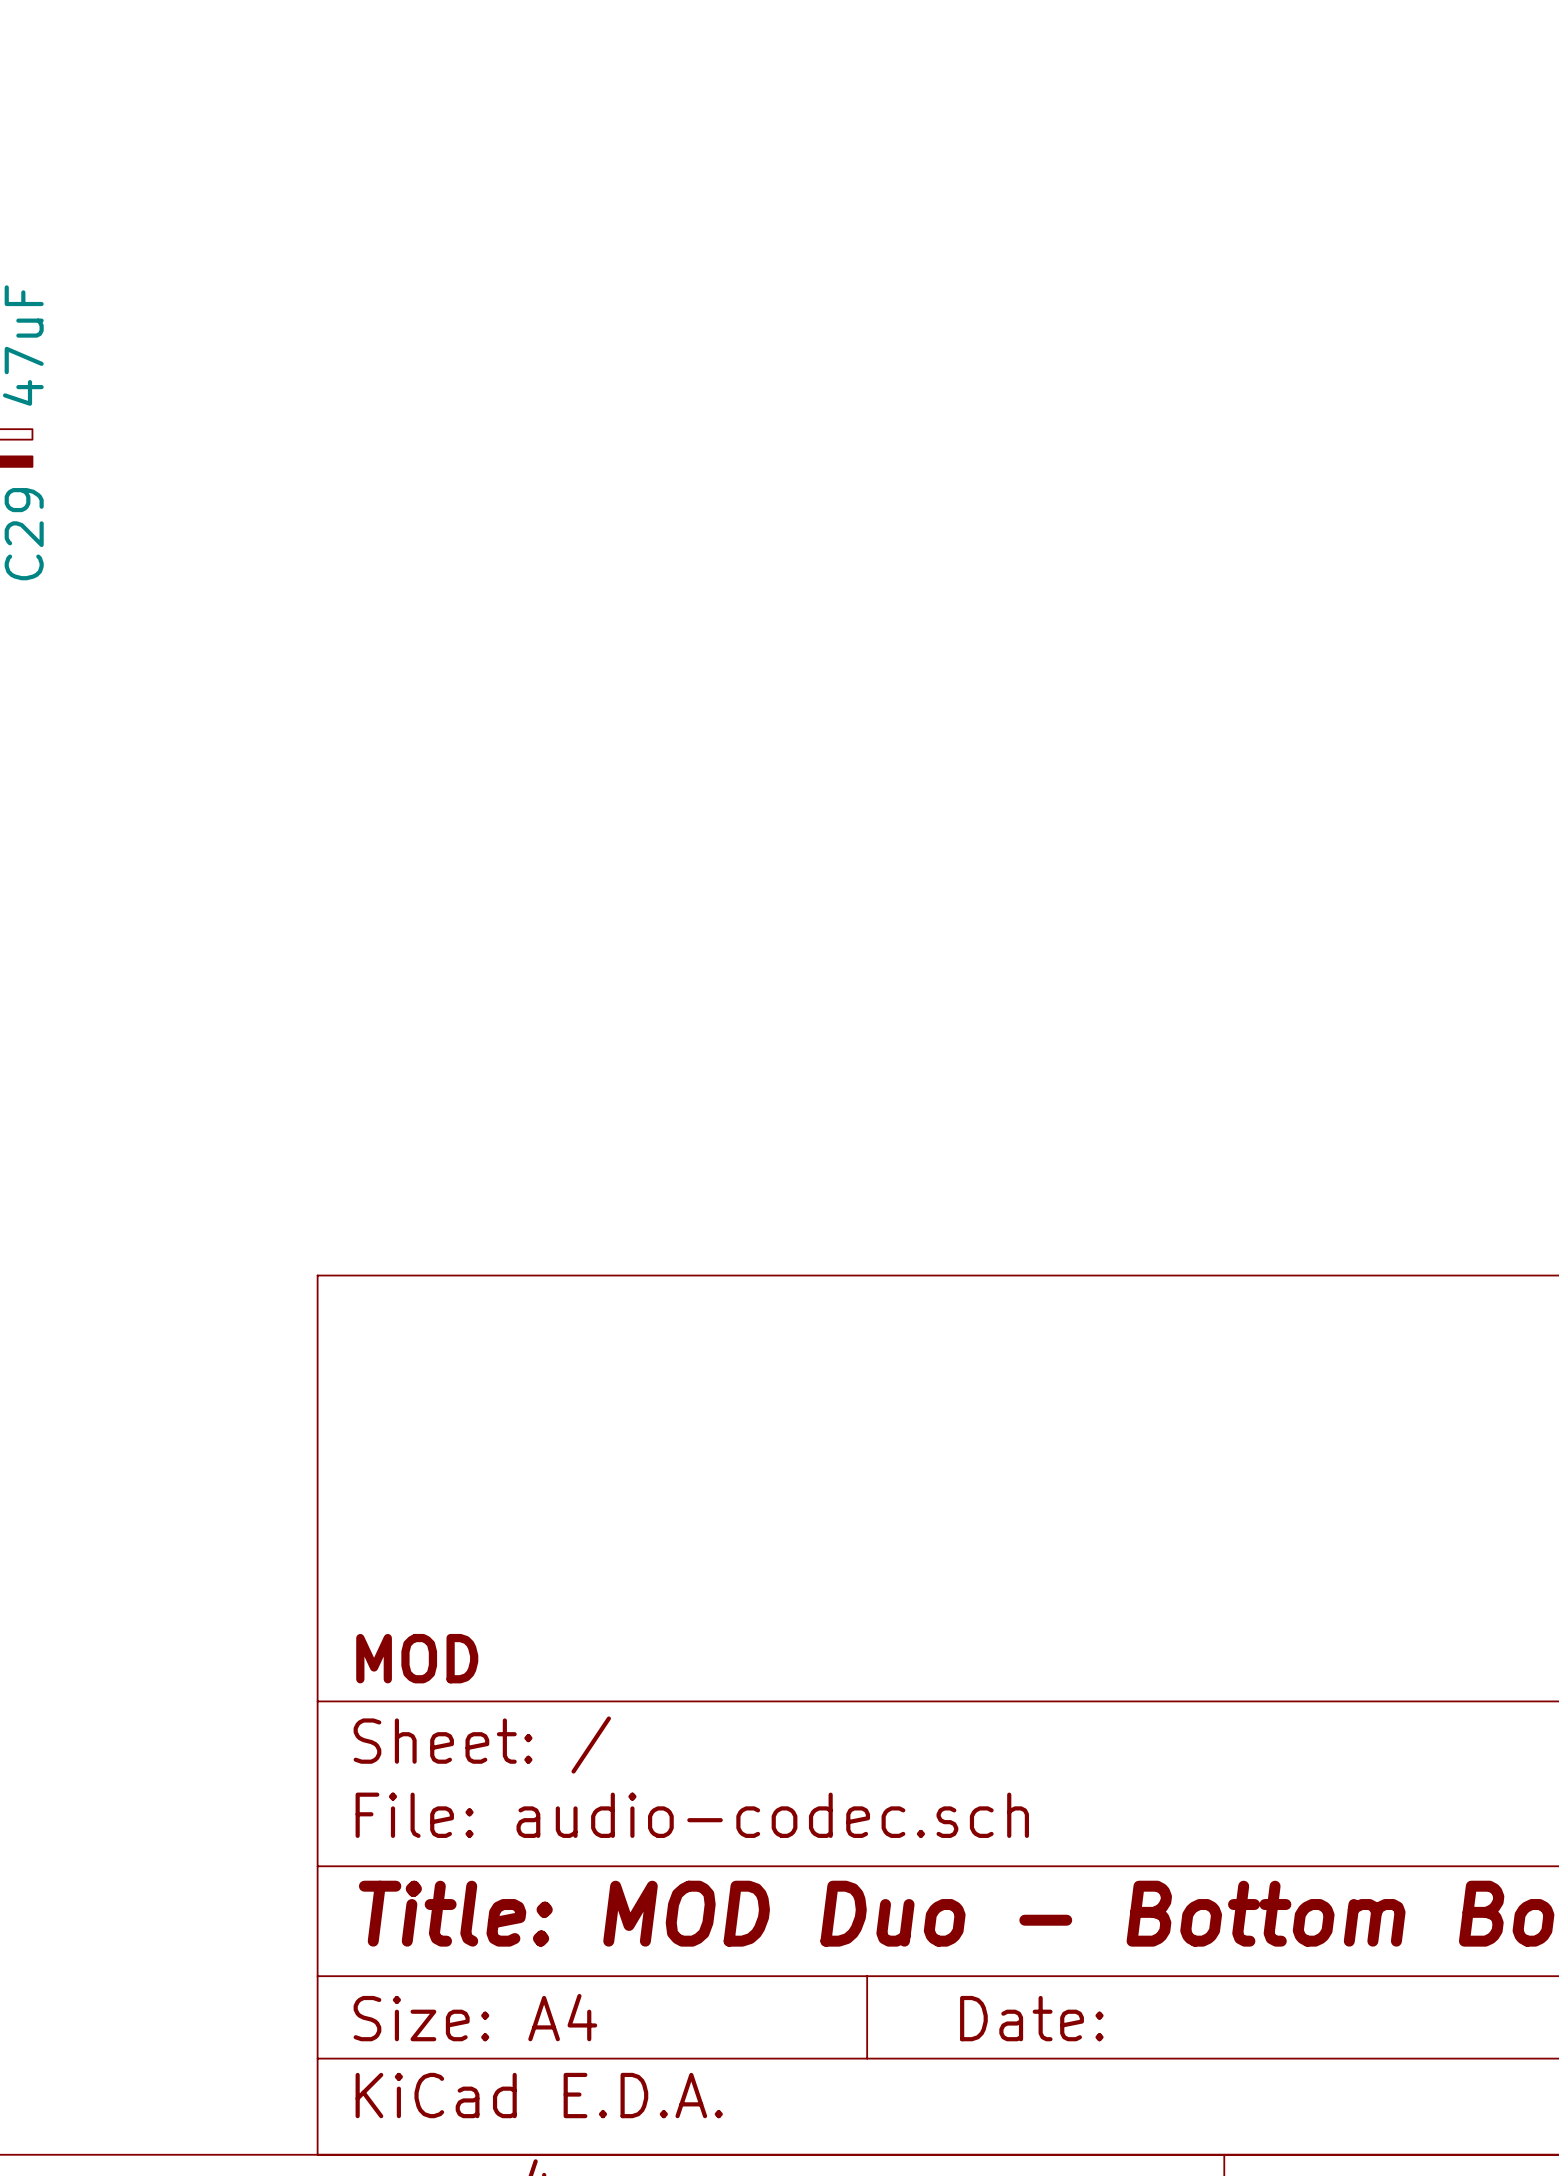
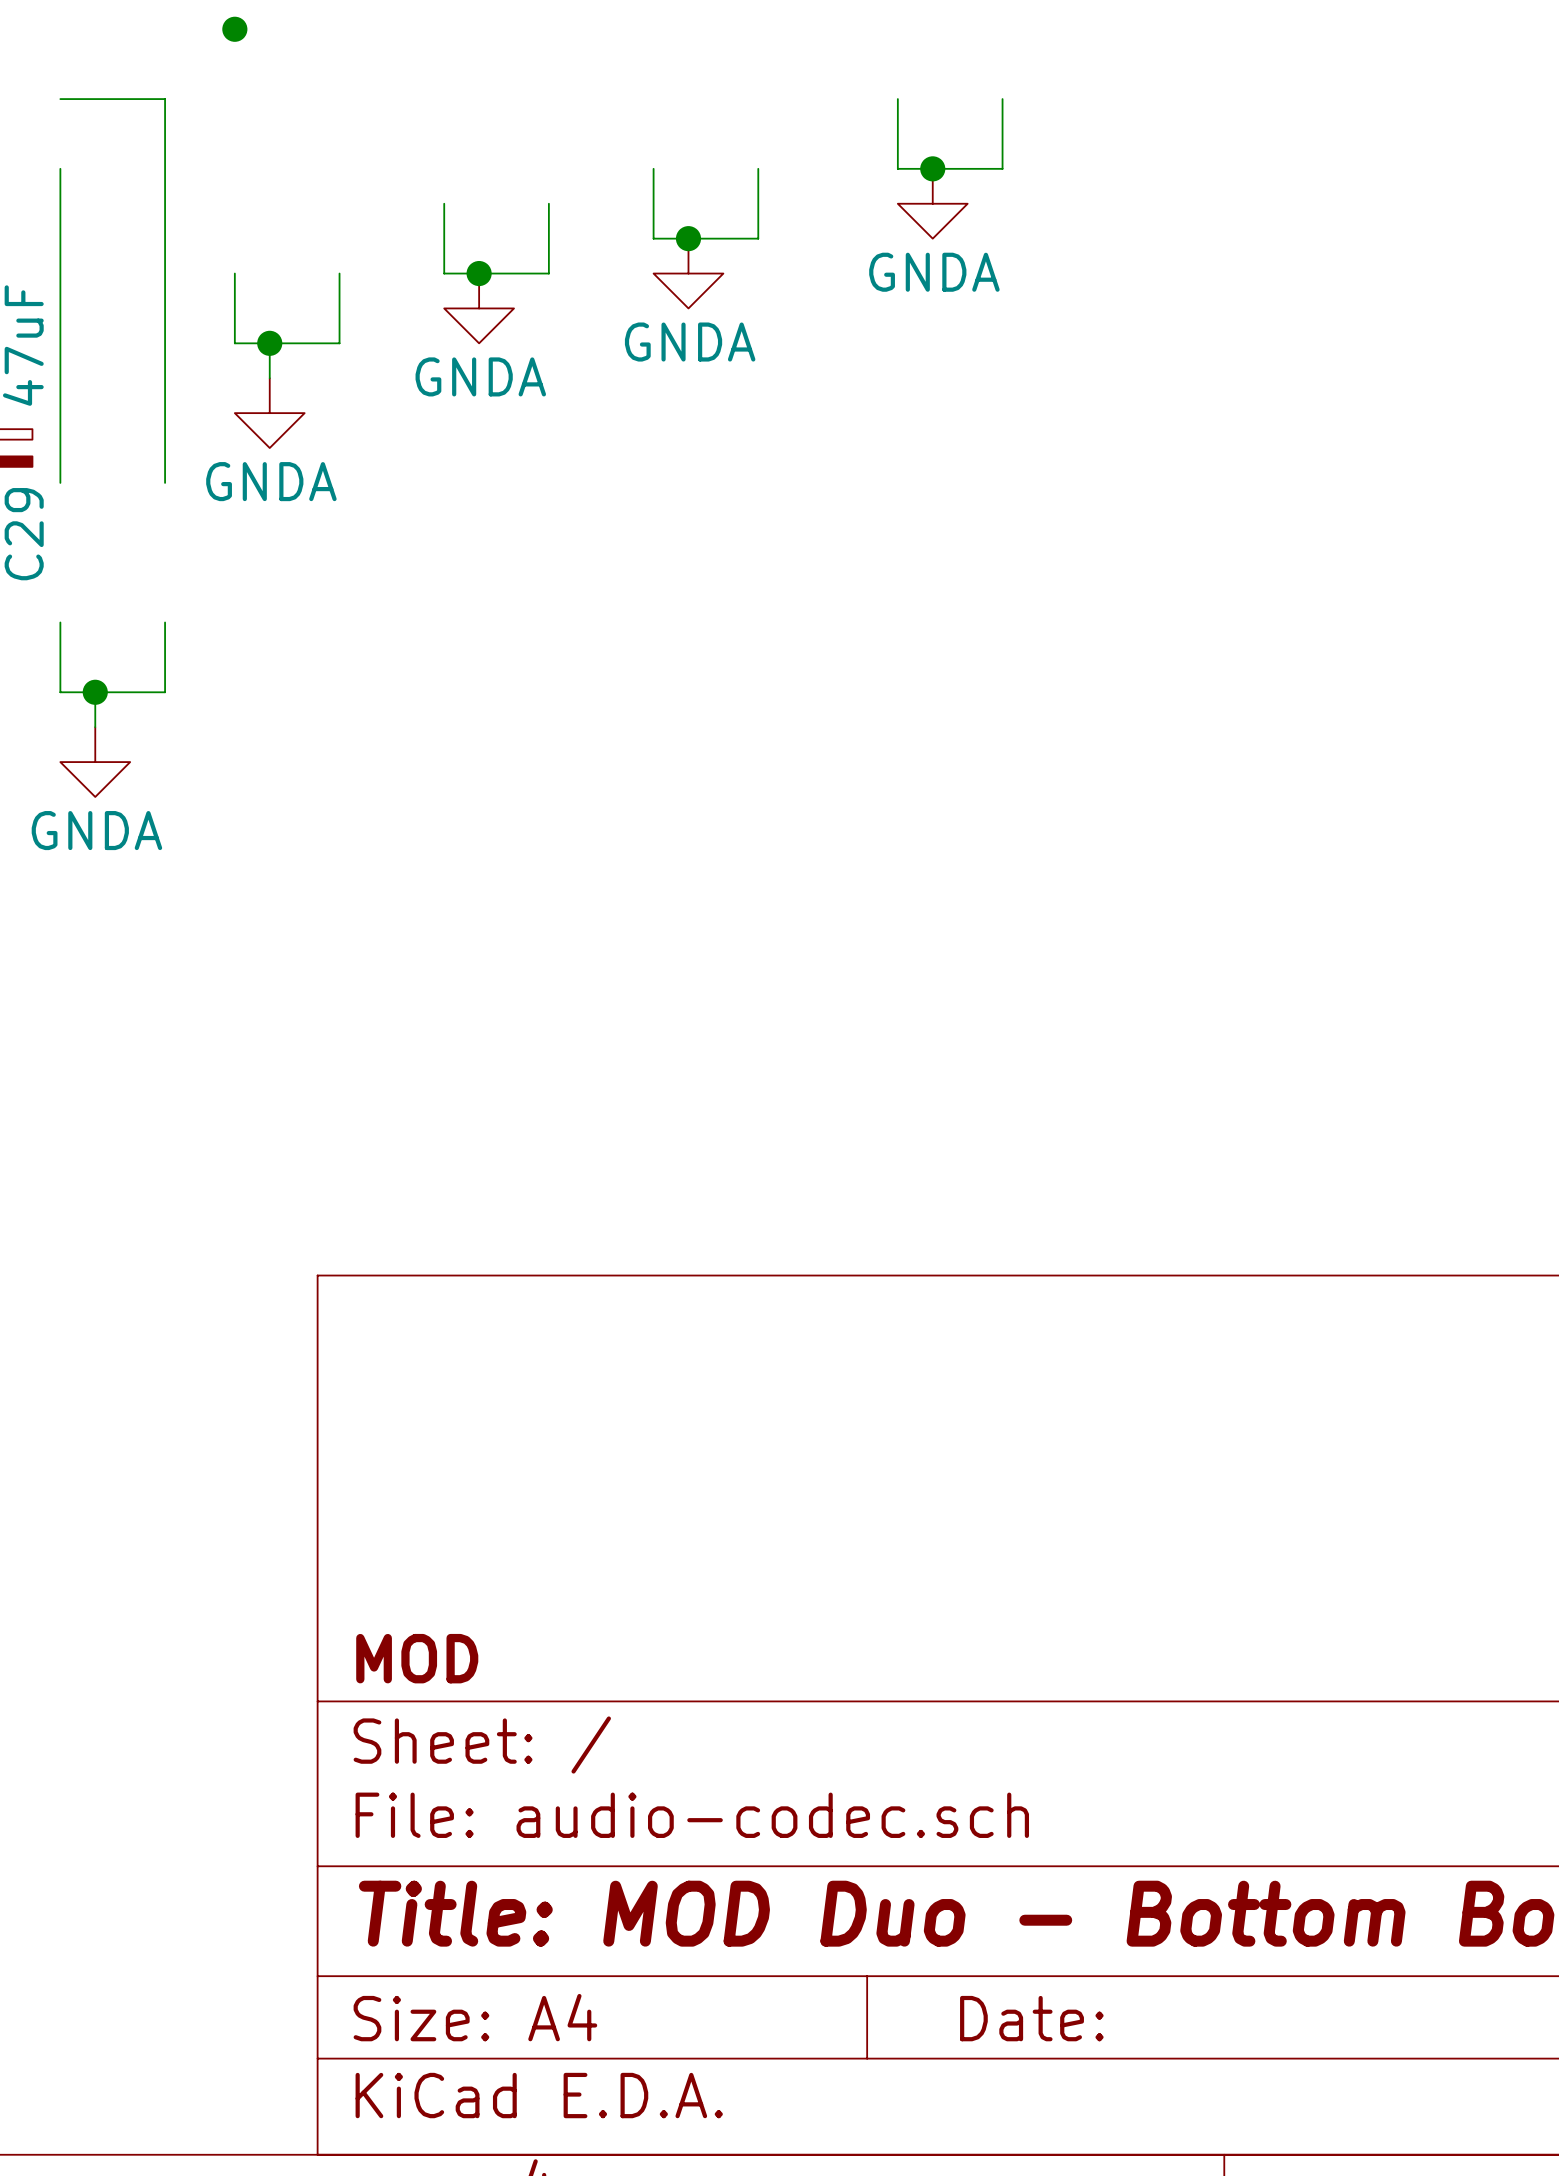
junction: none -> (234, 29)
wire: none -> (60, 99) (165, 99) (165, 482)
wire: none -> (897, 99) (897, 168) (1002, 168) (1002, 99)
wire: none -> (60, 168) (60, 482)
wire: none -> (653, 168) (653, 238) (758, 238) (758, 168)
junction: none -> (932, 168)
wire: none -> (444, 203) (444, 273) (548, 273) (548, 203)
power symbol: none -> GNDA (932, 203)
junction: none -> (688, 238)
wire: none -> (234, 273) (234, 343) (339, 343) (339, 273)
junction: none -> (479, 273)
power symbol: none -> GNDA (688, 273)
power symbol: none -> GNDA (479, 308)
wire: none -> (269, 343) (269, 378)
junction: none -> (269, 343)
power symbol: none -> GNDA (269, 413)
wire: none -> (60, 622) (60, 692) (165, 692) (165, 622)
wire: none -> (95, 692) (95, 727)
junction: none -> (95, 692)
power symbol: none -> GNDA (95, 762)

